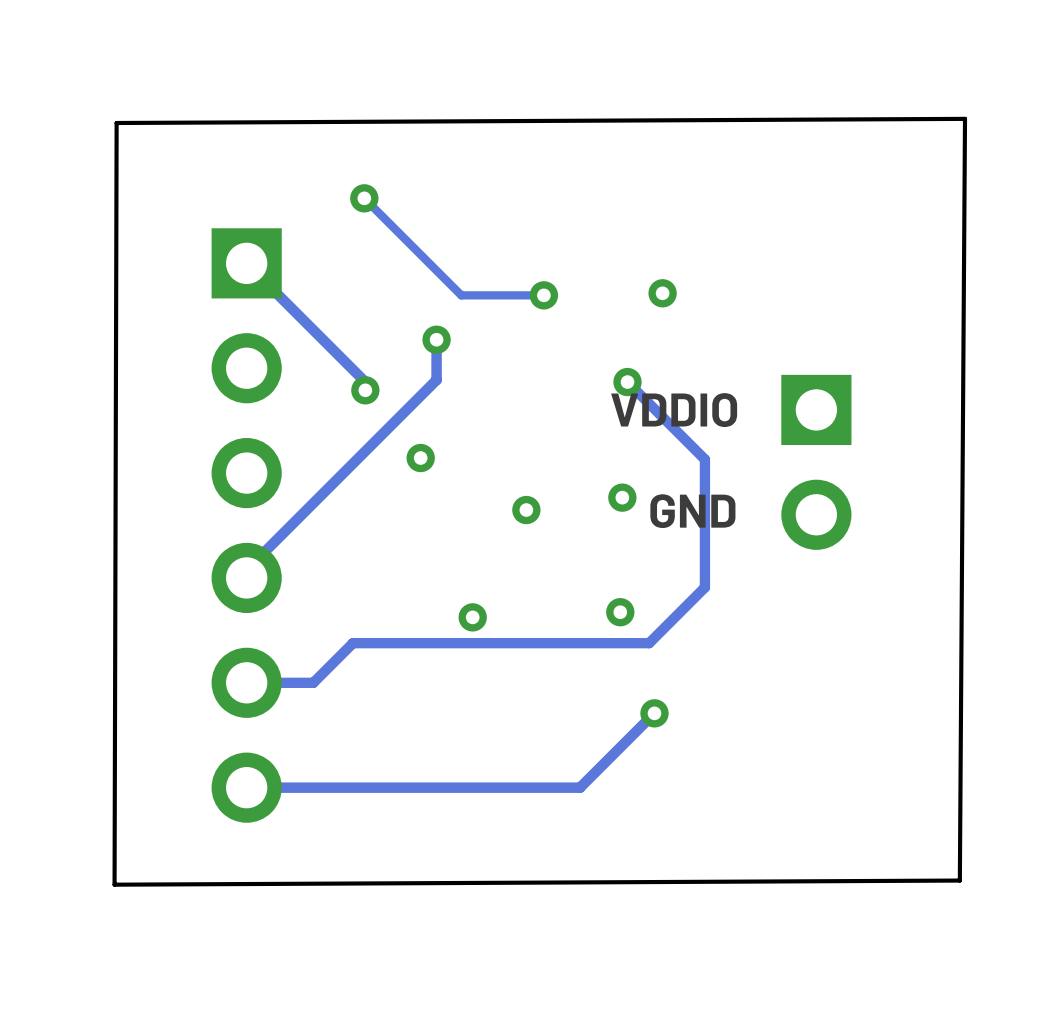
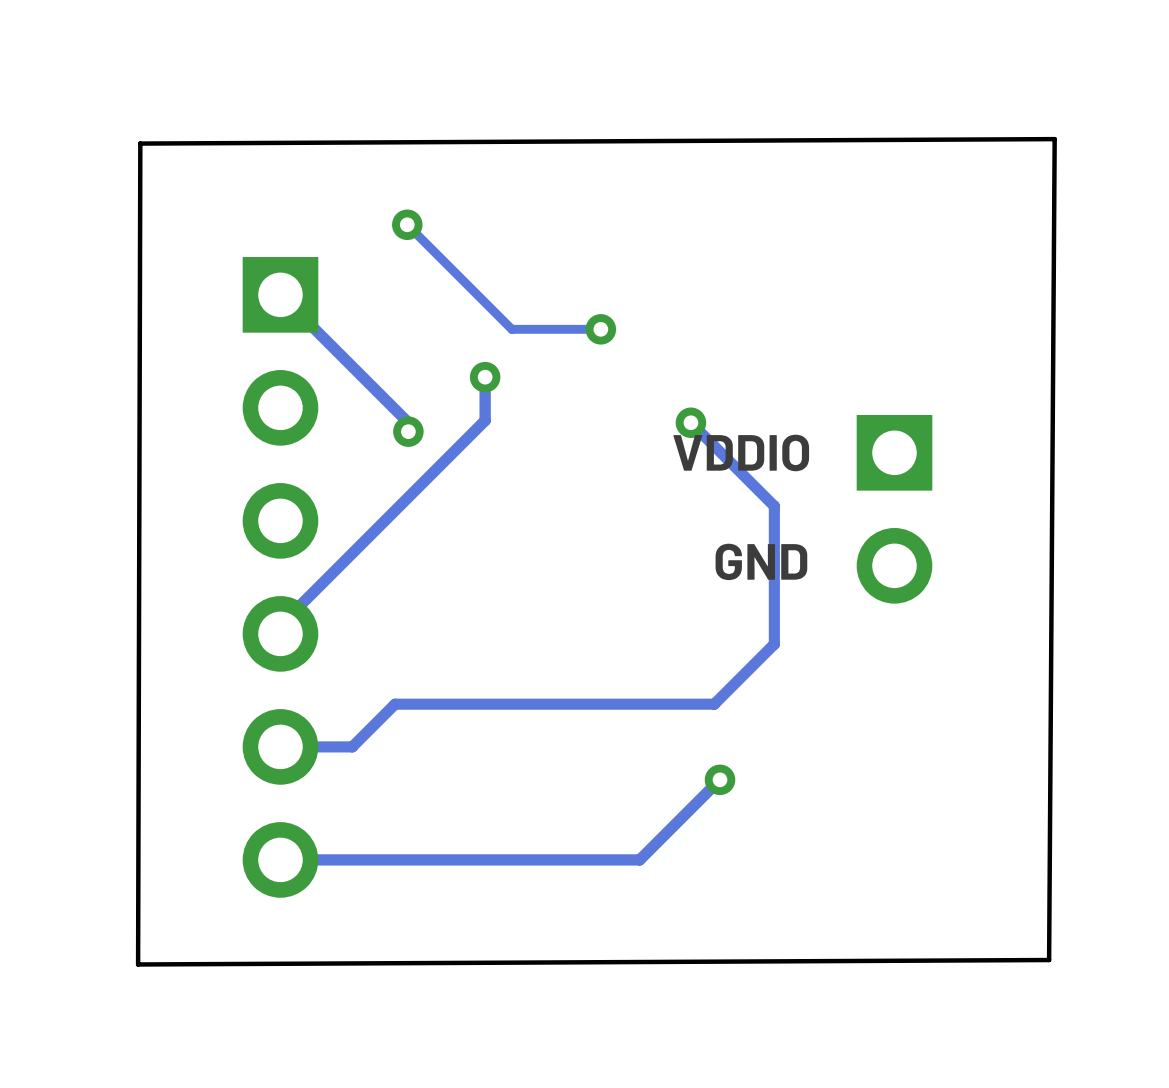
via: (662, 293) -> none
via: (420, 458) -> none
via: (622, 497) -> none
via: (526, 510) -> none
via: (620, 612) -> none
via: (472, 617) -> none

